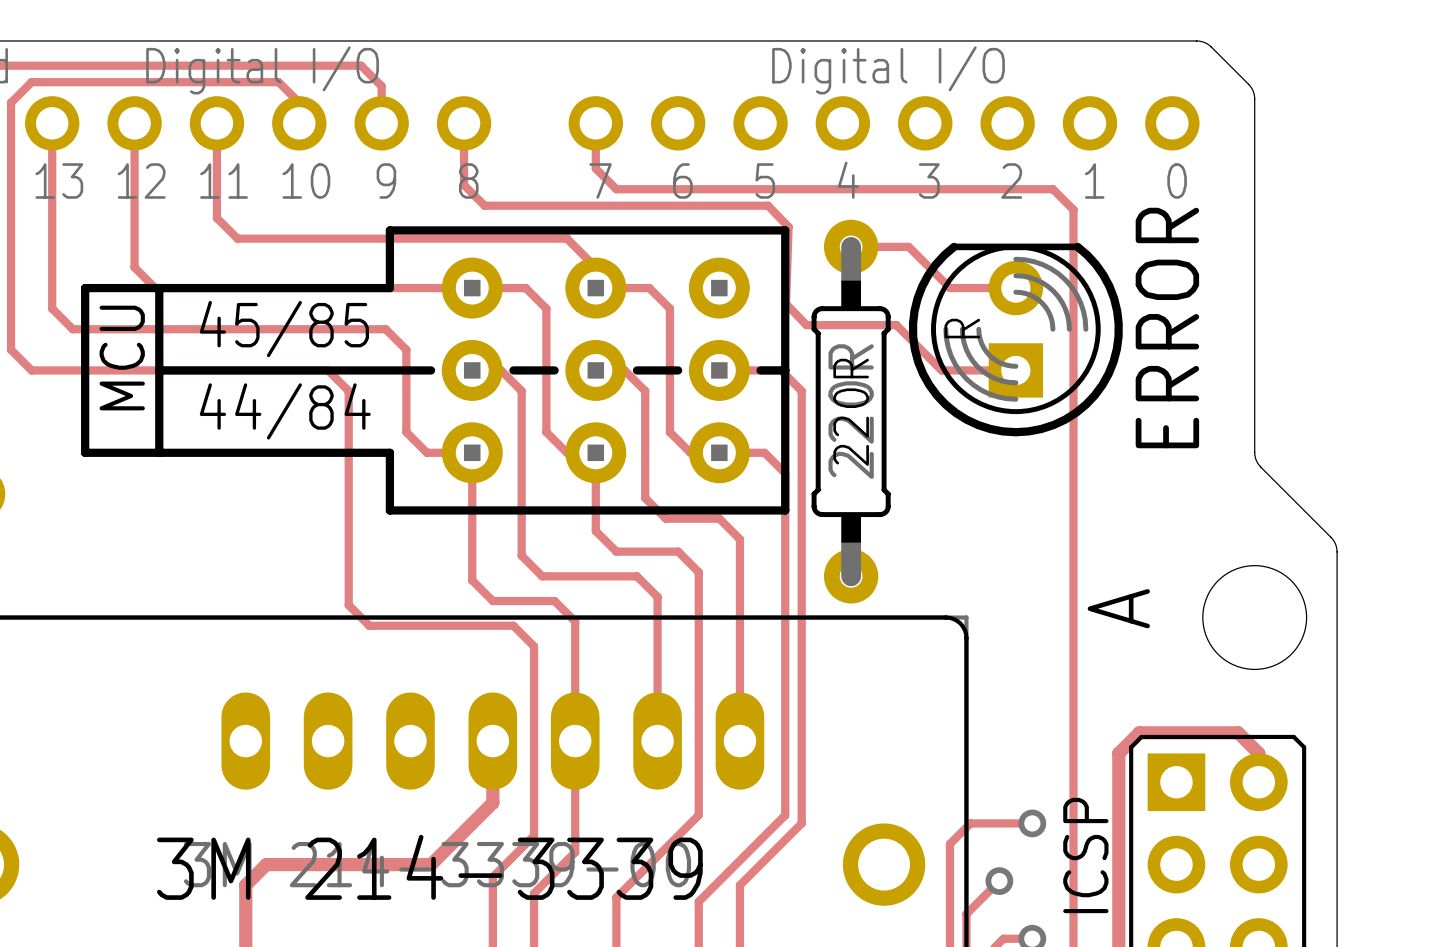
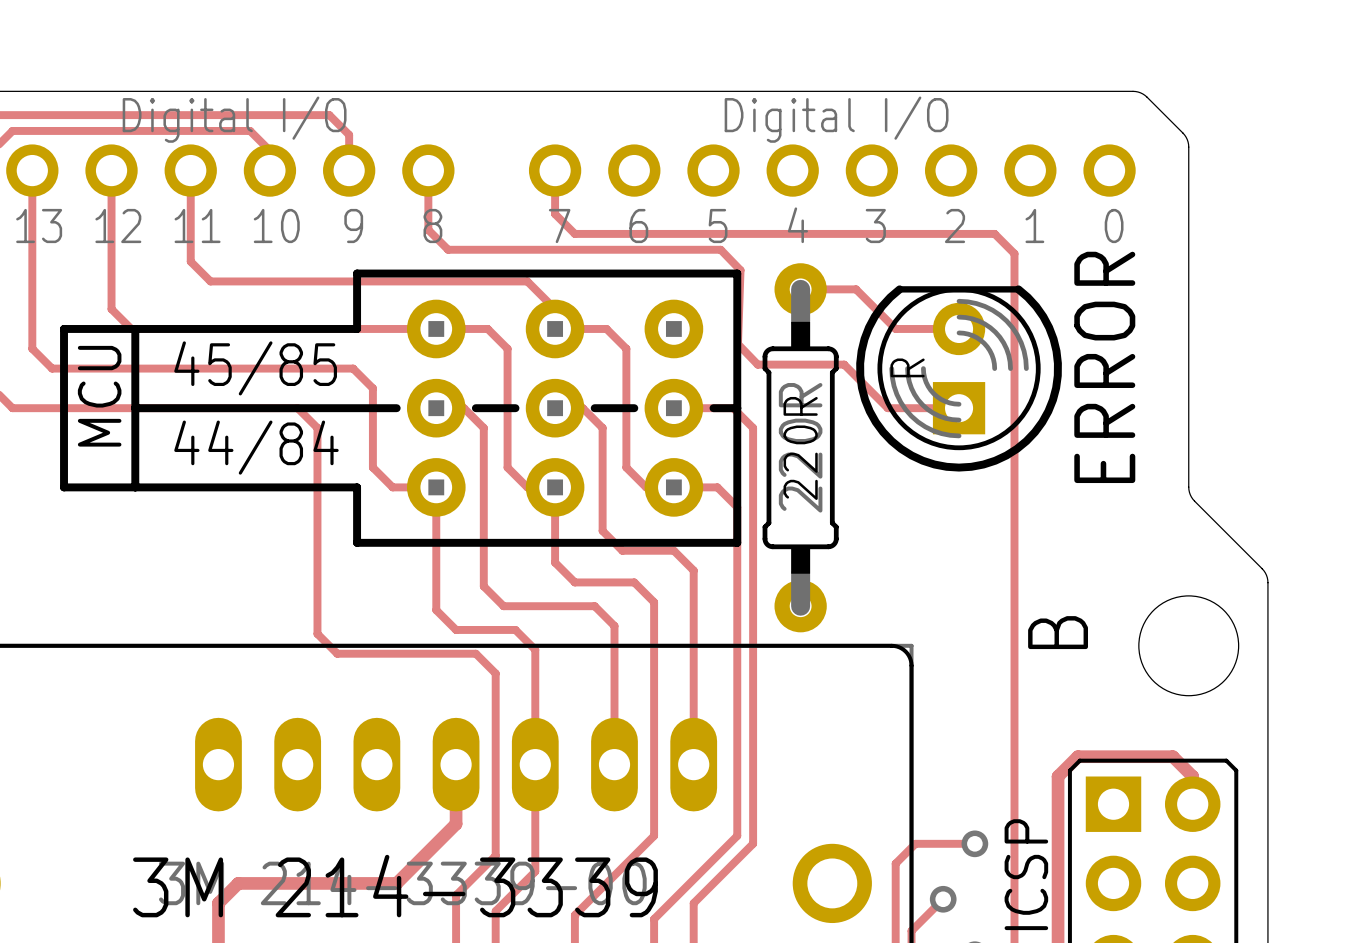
text: A (1118, 608) -> B (1058, 632)

